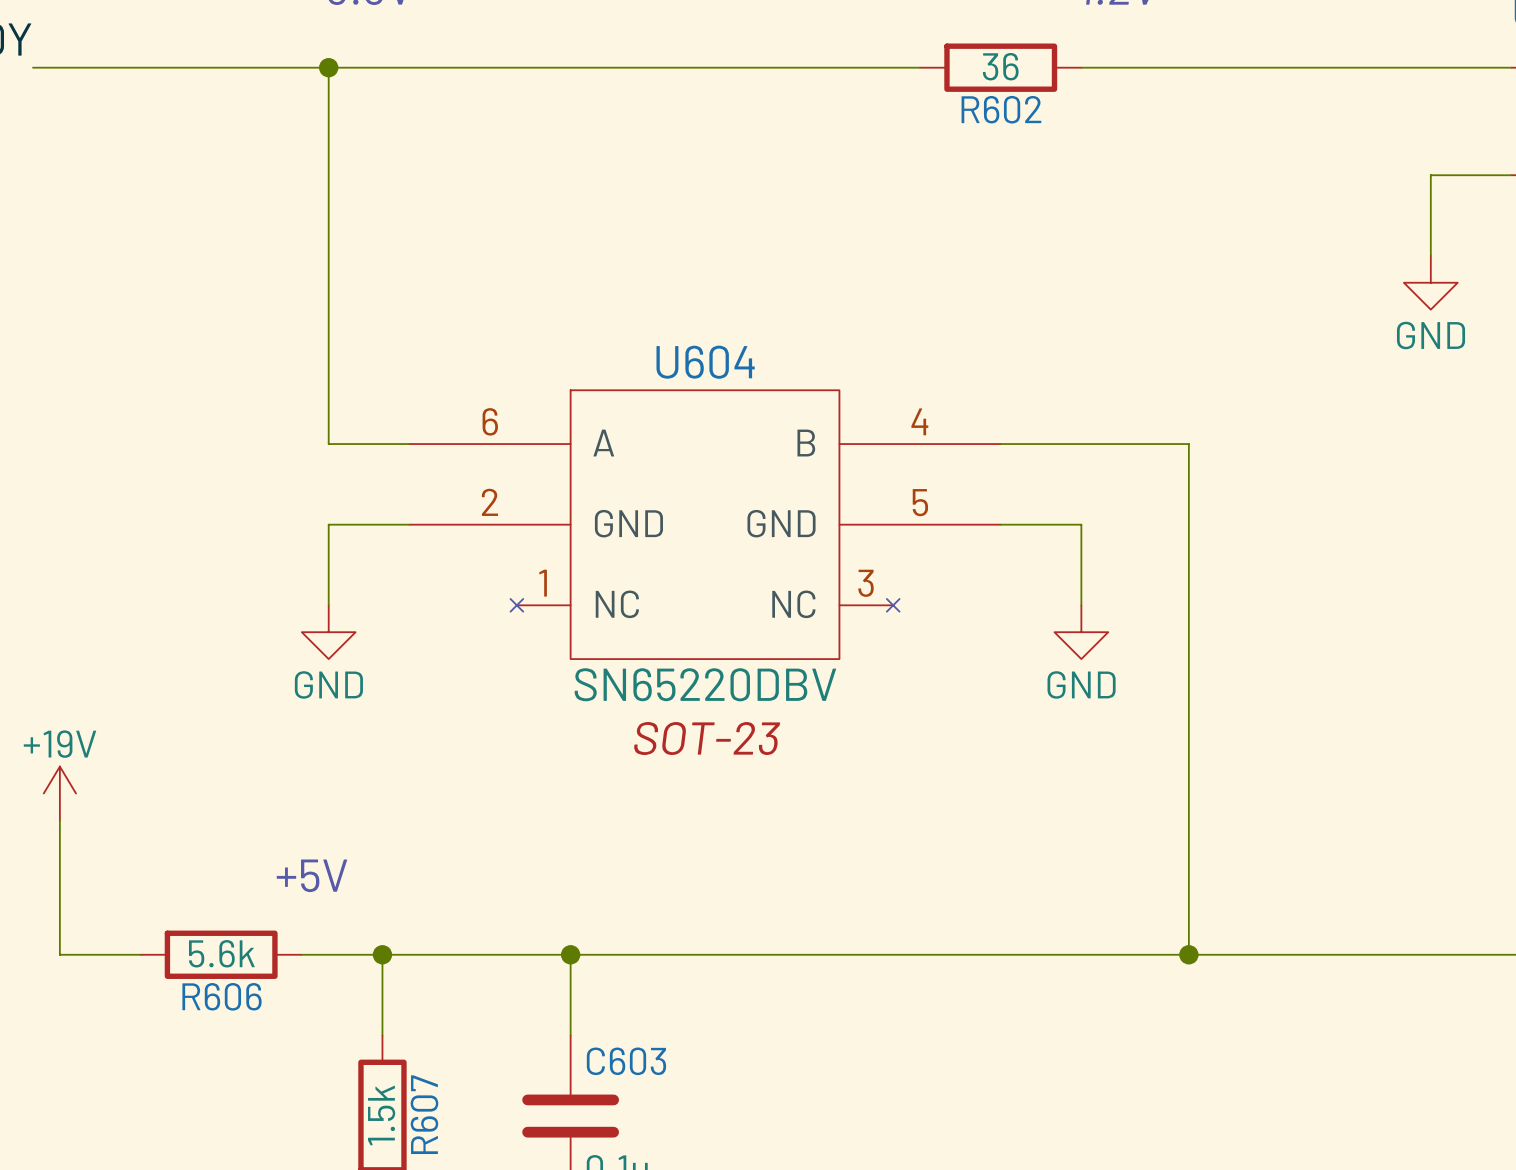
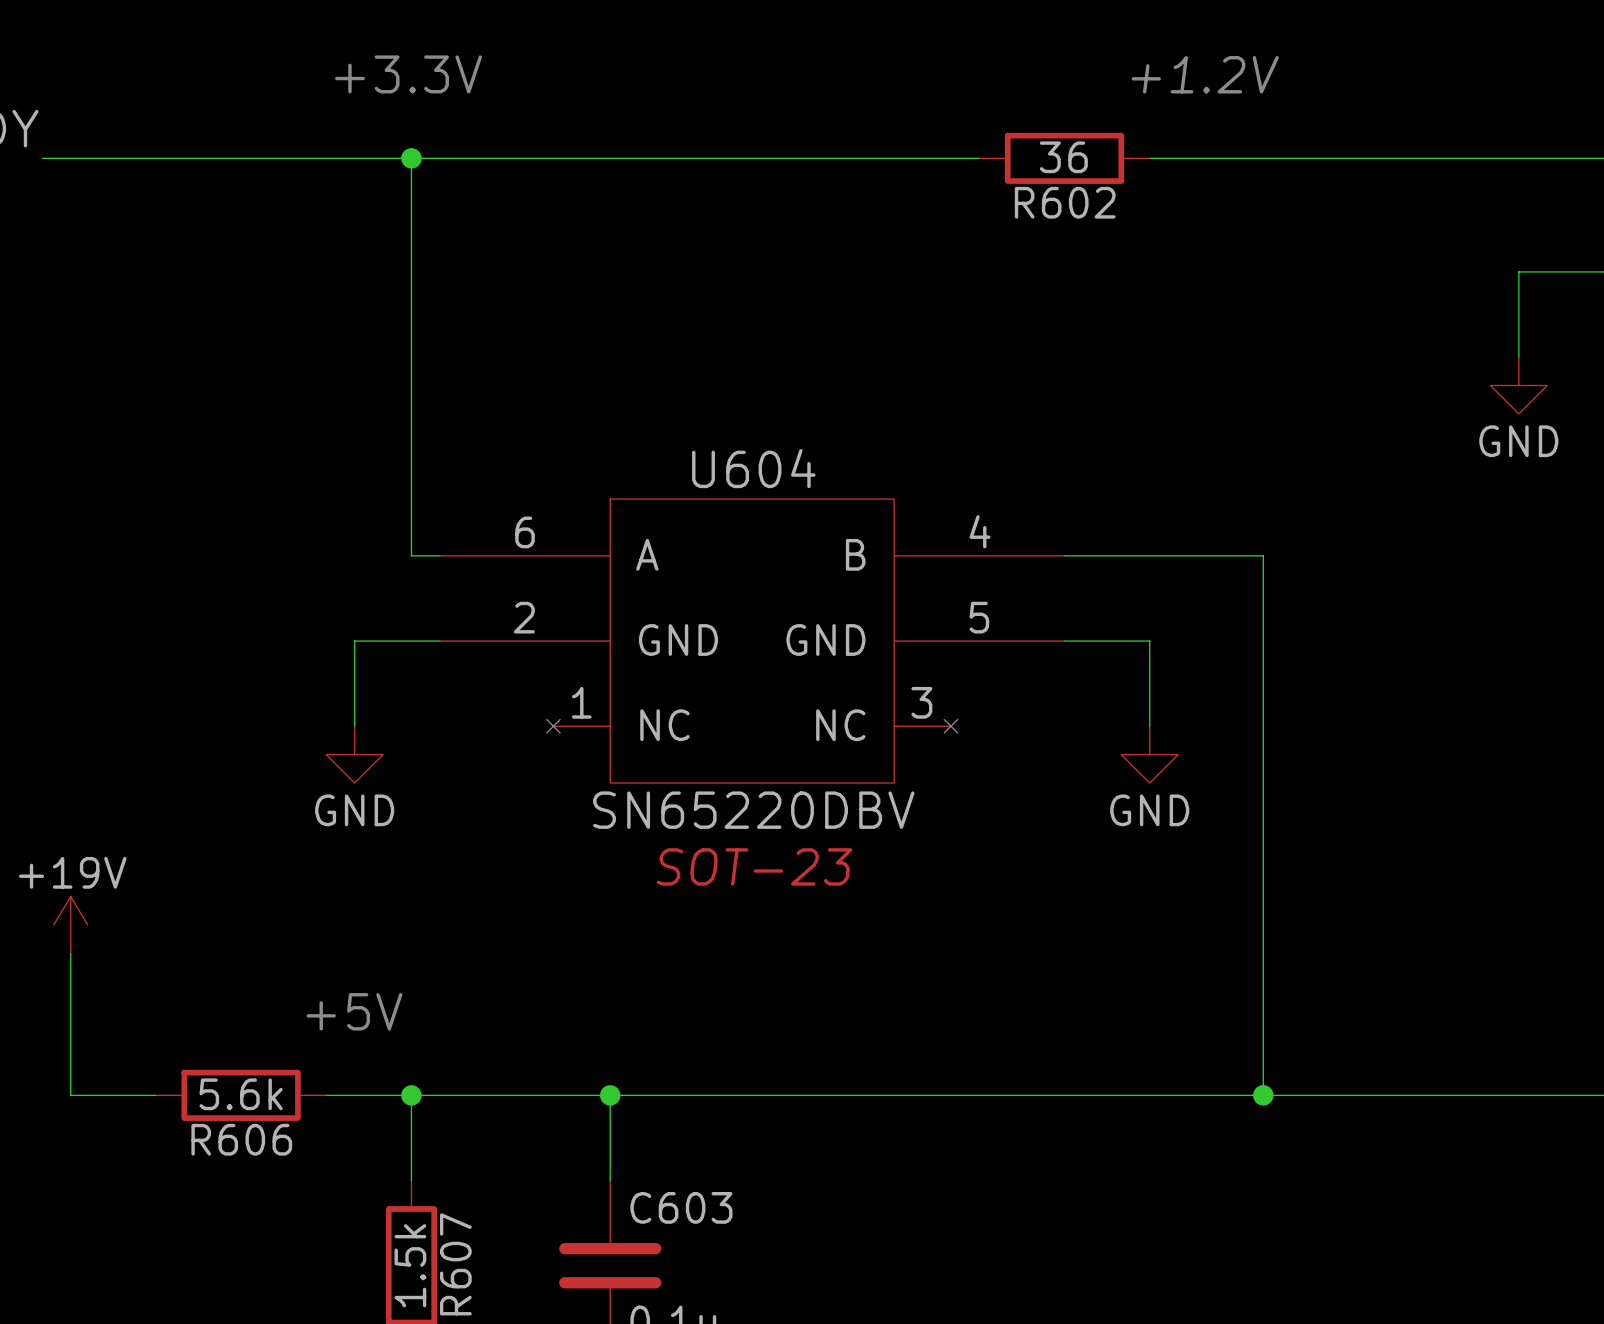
wire: (328, 67) (328, 444) (382, 444) -> (411, 158) (411, 555)
junction position: (328, 67) -> (411, 158)

